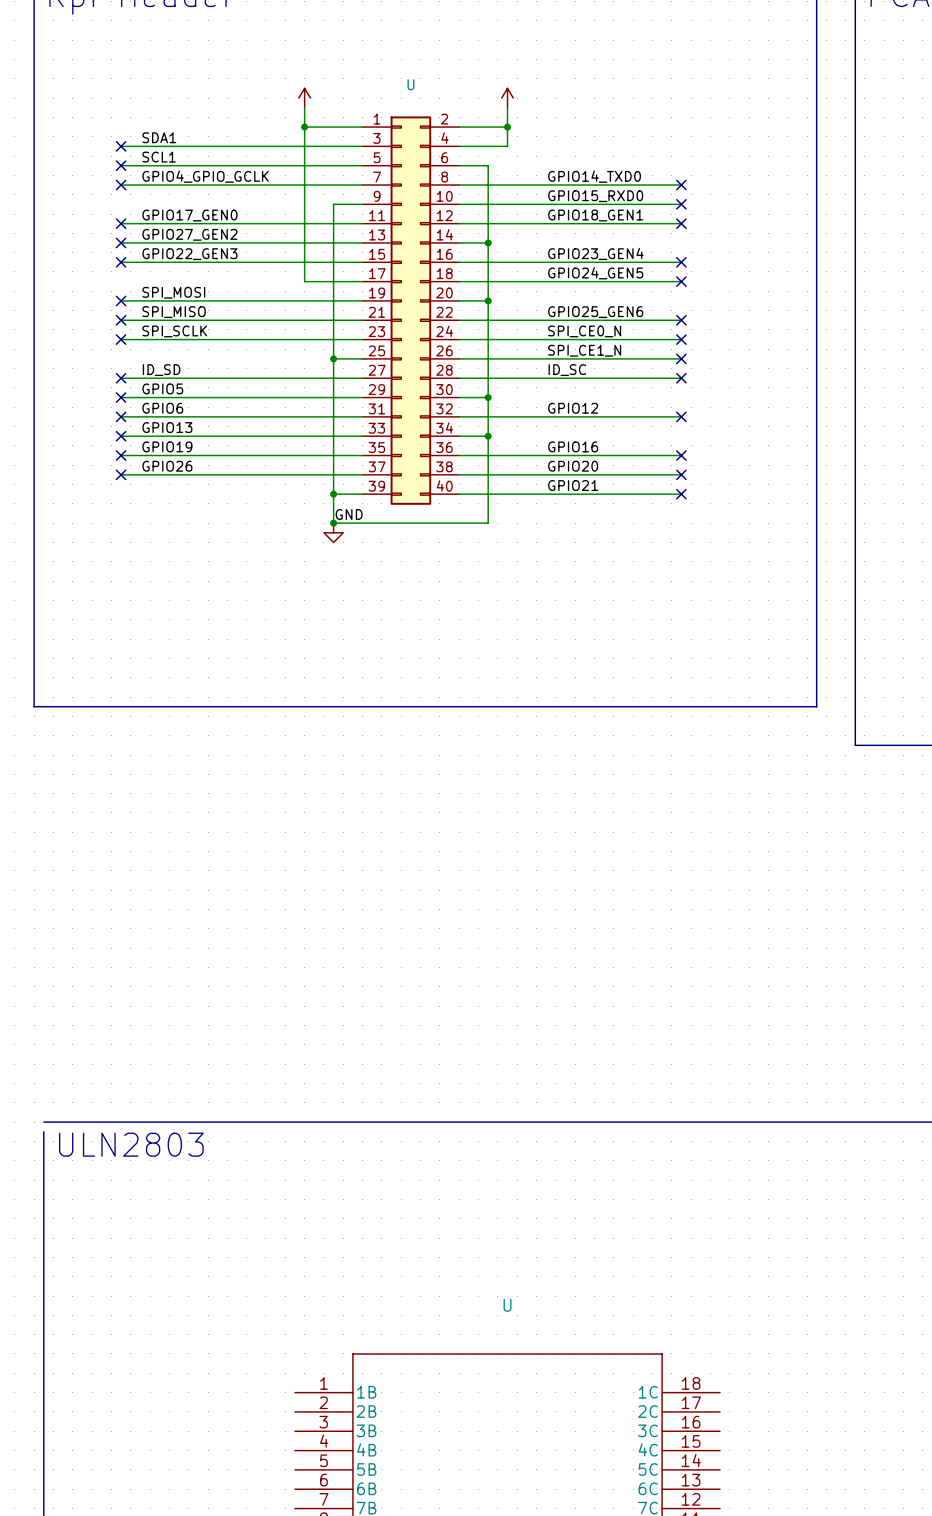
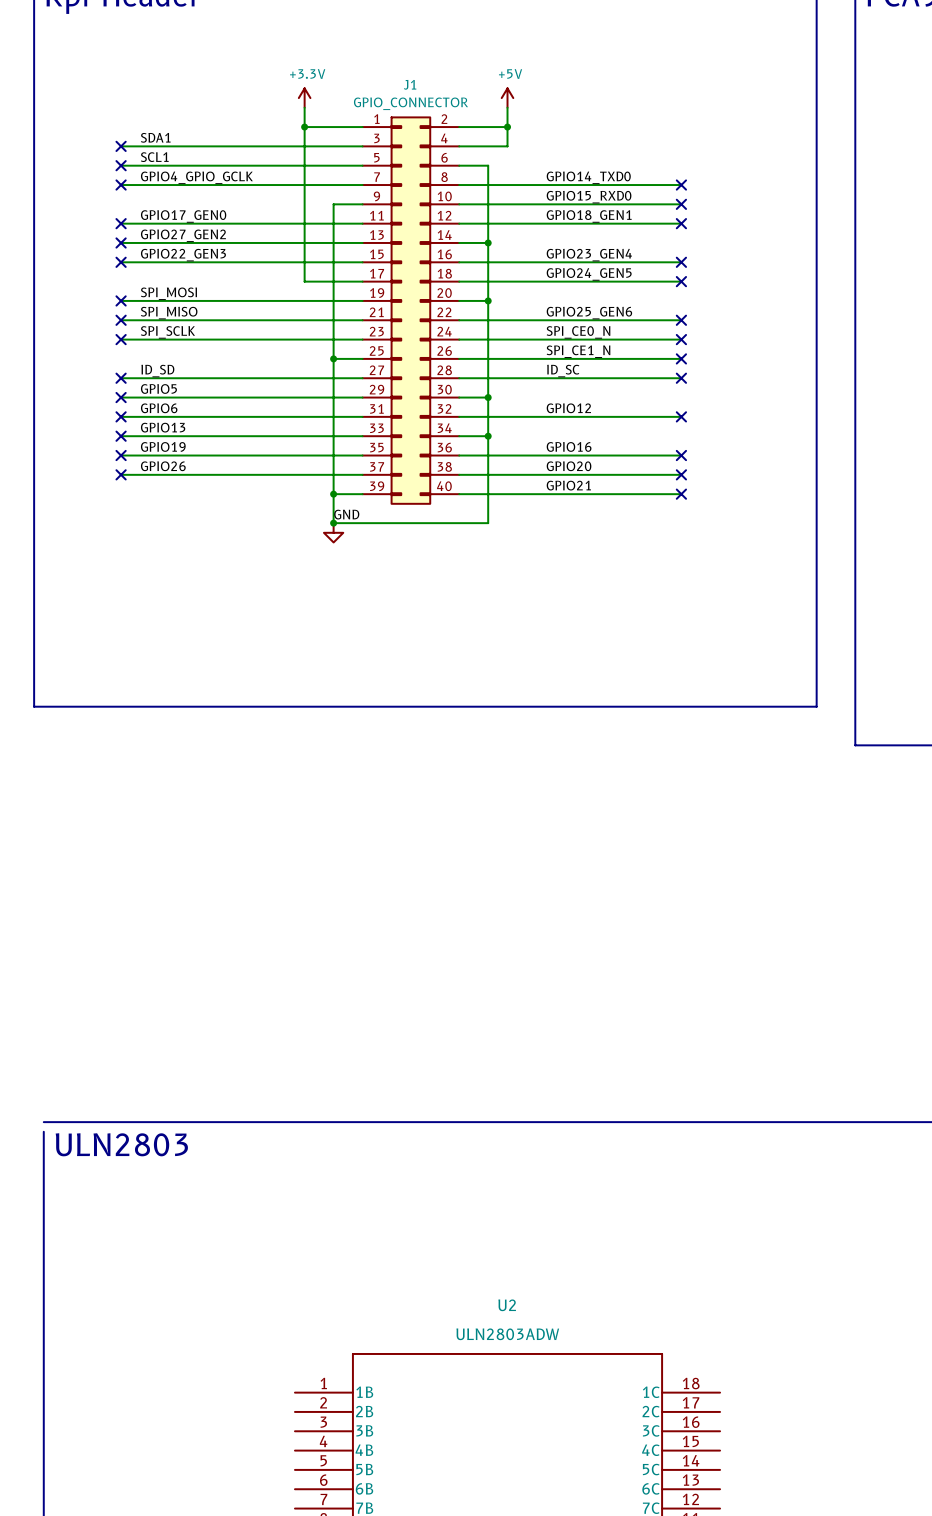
power symbol text: none -> +3.3V (307, 74)
power symbol text: none -> +5V (510, 74)
U name: U (410, 84) -> J1 (410, 84)
U value: none -> GPIO_CONNECTOR (410, 103)
U name: U (507, 1305) -> U2 (507, 1305)
U value: none -> ULN2803ADW (507, 1334)

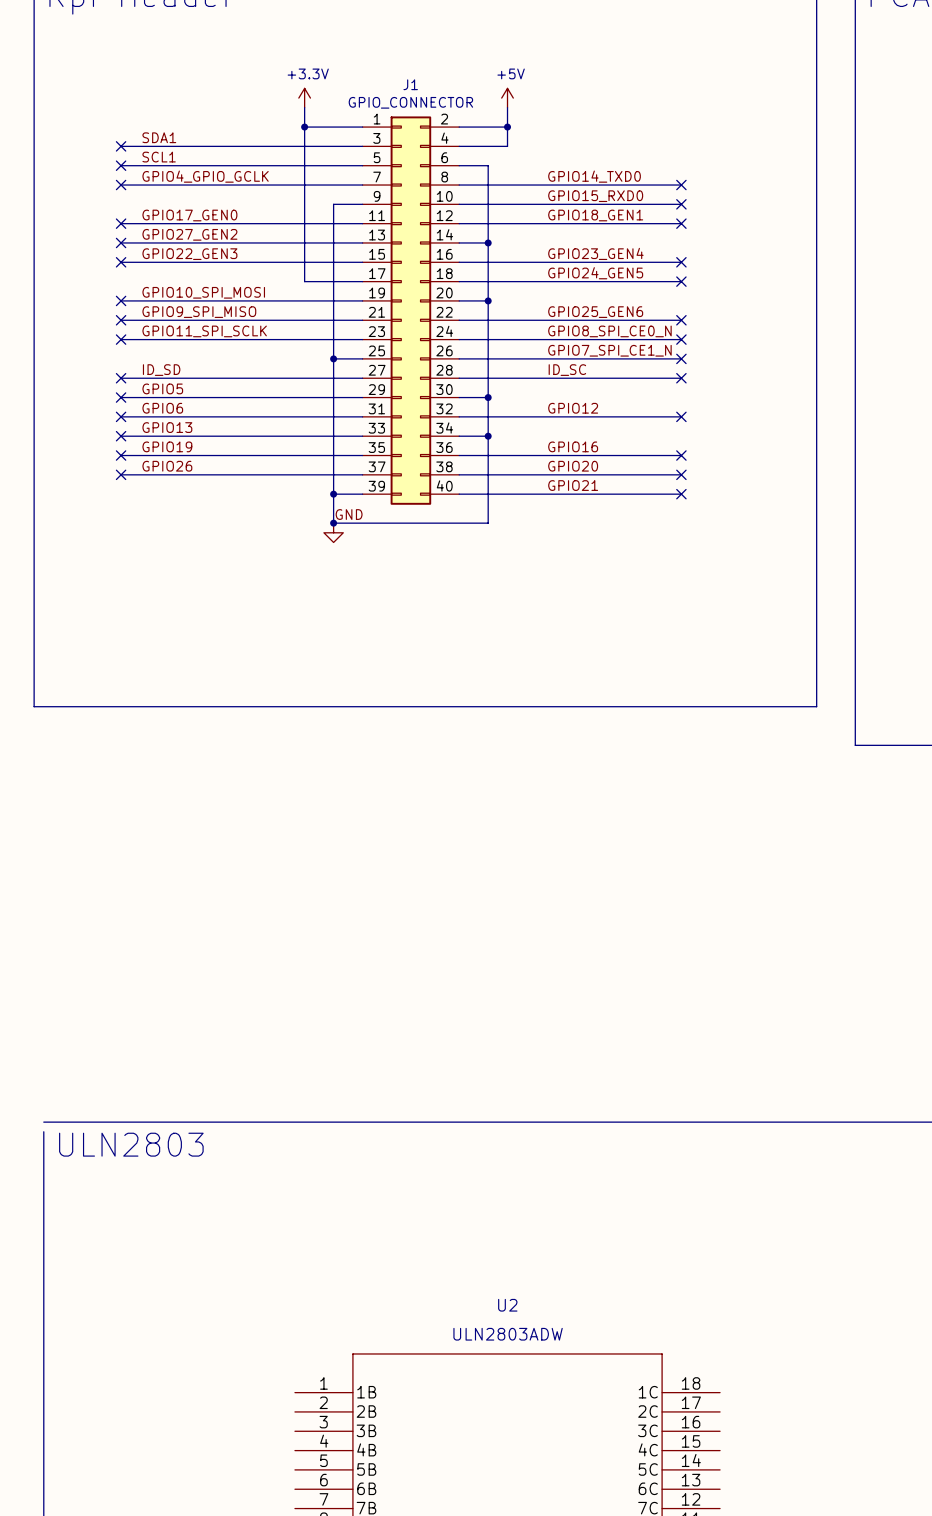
label: SPI_MOSI (168, 293) -> GPIO10_SPI_MOSI (203, 292)
label: SPI_MISO (169, 313) -> GPIO9_SPI_MISO (199, 312)
label: SPI_SCLK (167, 332) -> GPIO11_SPI_SCLK (204, 331)
label: SPI_CE0_N (578, 332) -> GPIO8_SPI_CE0_N (609, 331)
label: SPI_CE1_N (578, 351) -> GPIO7_SPI_CE1_N (609, 350)

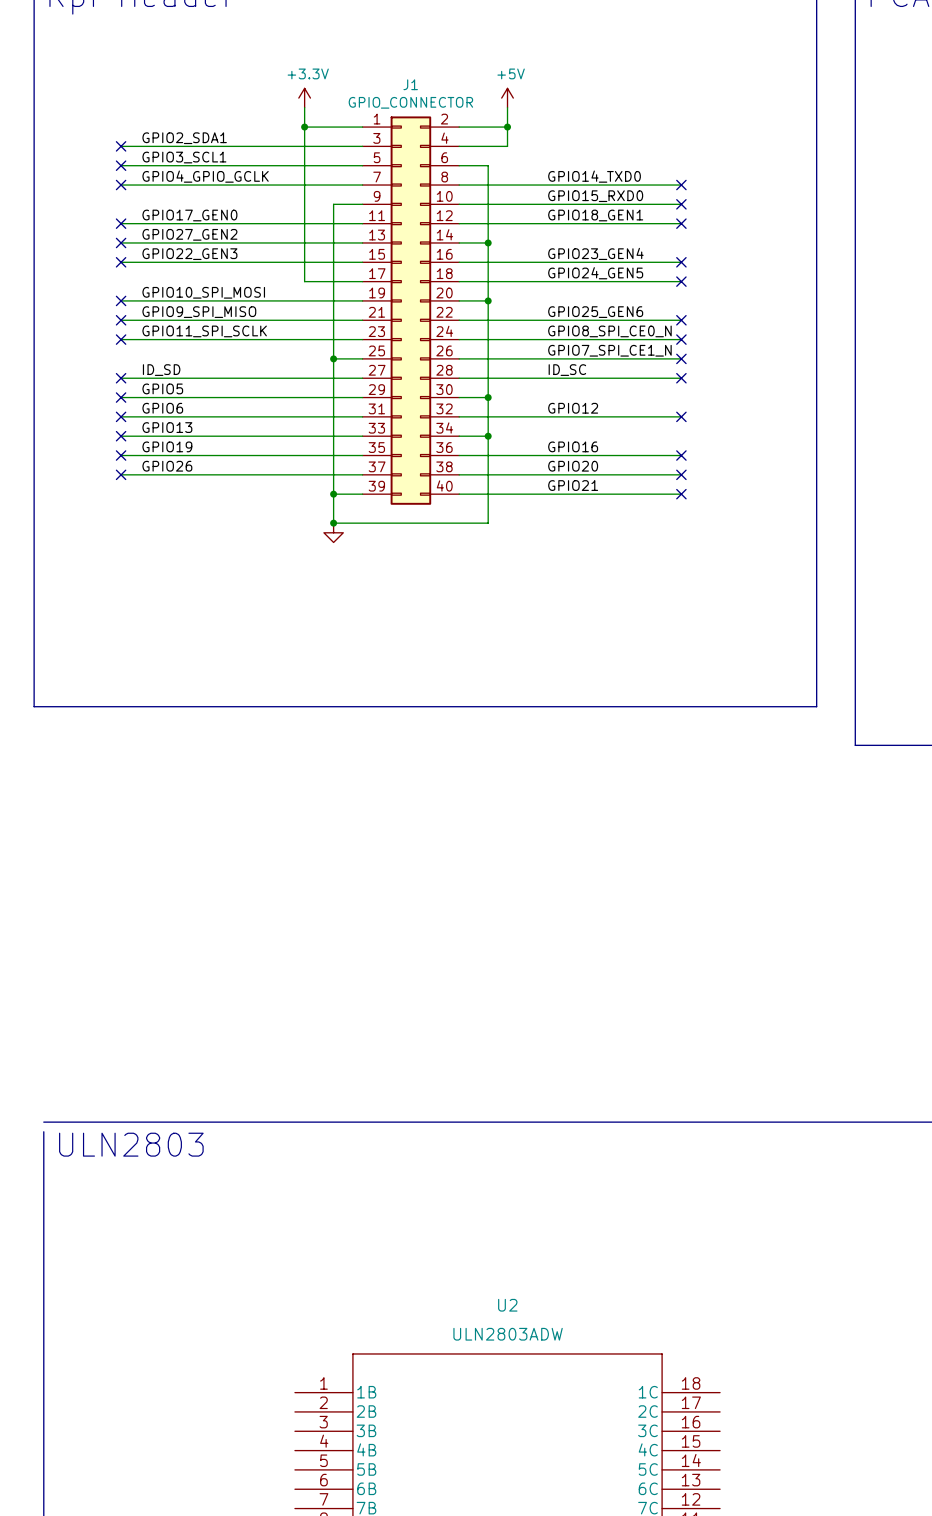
label: SDA1 (159, 137) -> GPIO2_SDA1 (184, 138)
label: SCL1 (159, 157) -> GPIO3_SCL1 (184, 157)
label: GND (349, 514) -> none

